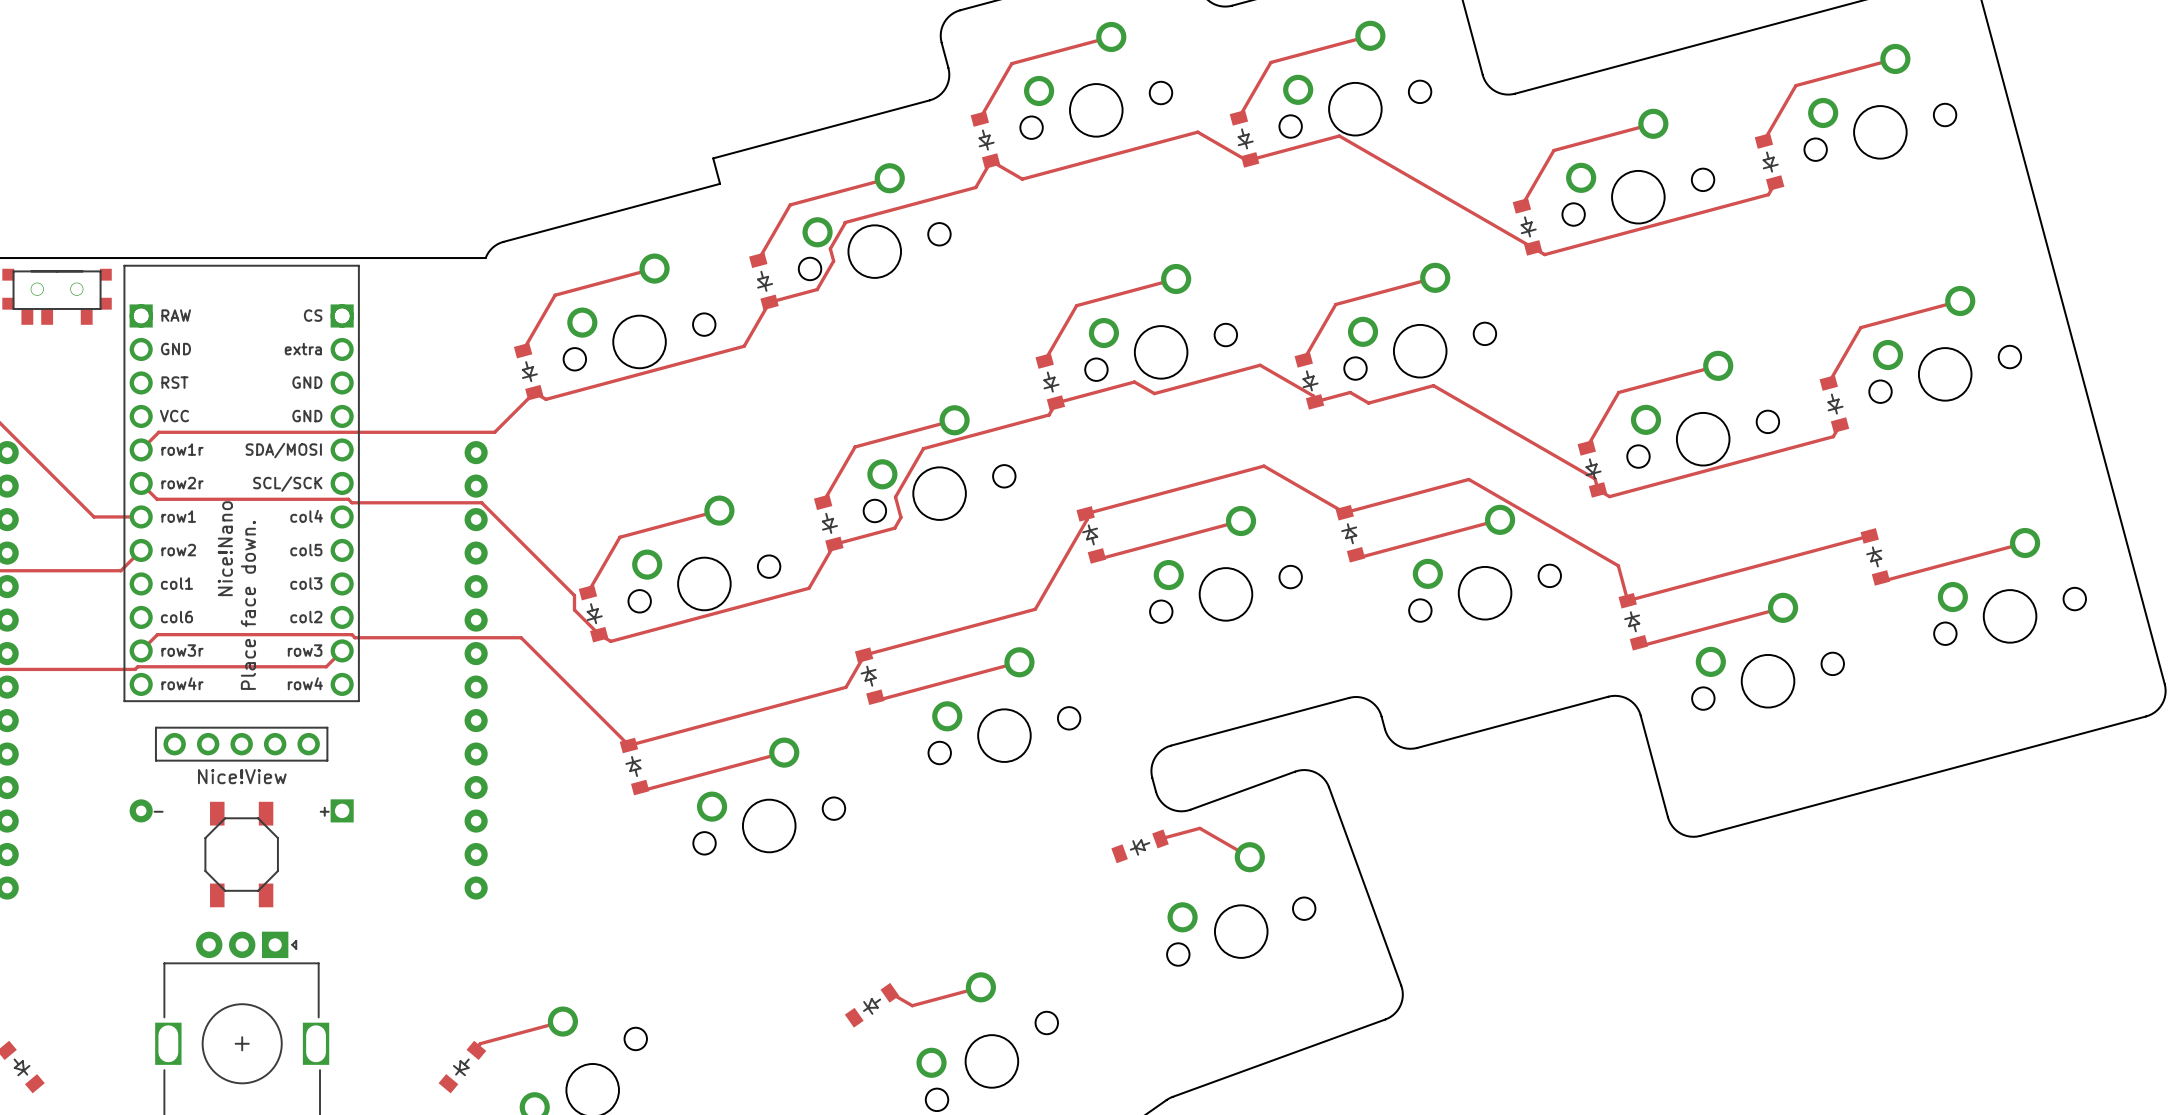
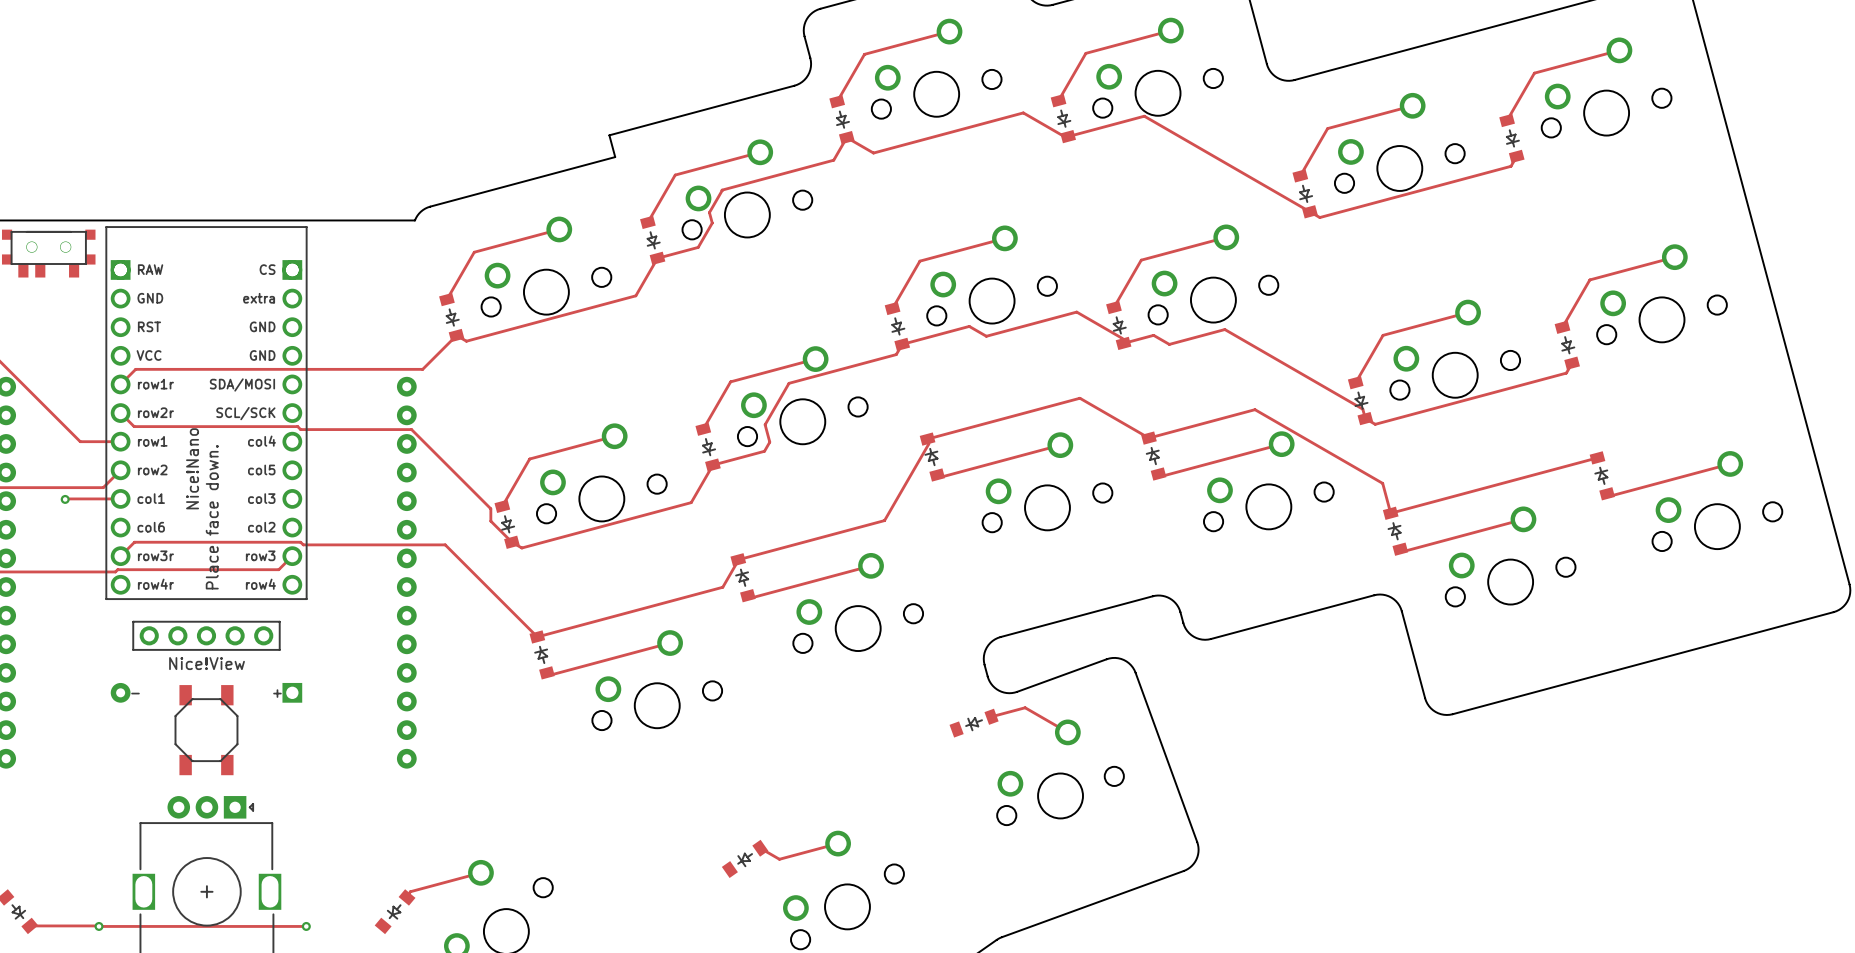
track: none -> (64, 498) (120, 498)
via: none -> (65, 499)
track: none -> (29, 925) (306, 926)
via: none -> (99, 926)
via: none -> (306, 926)

